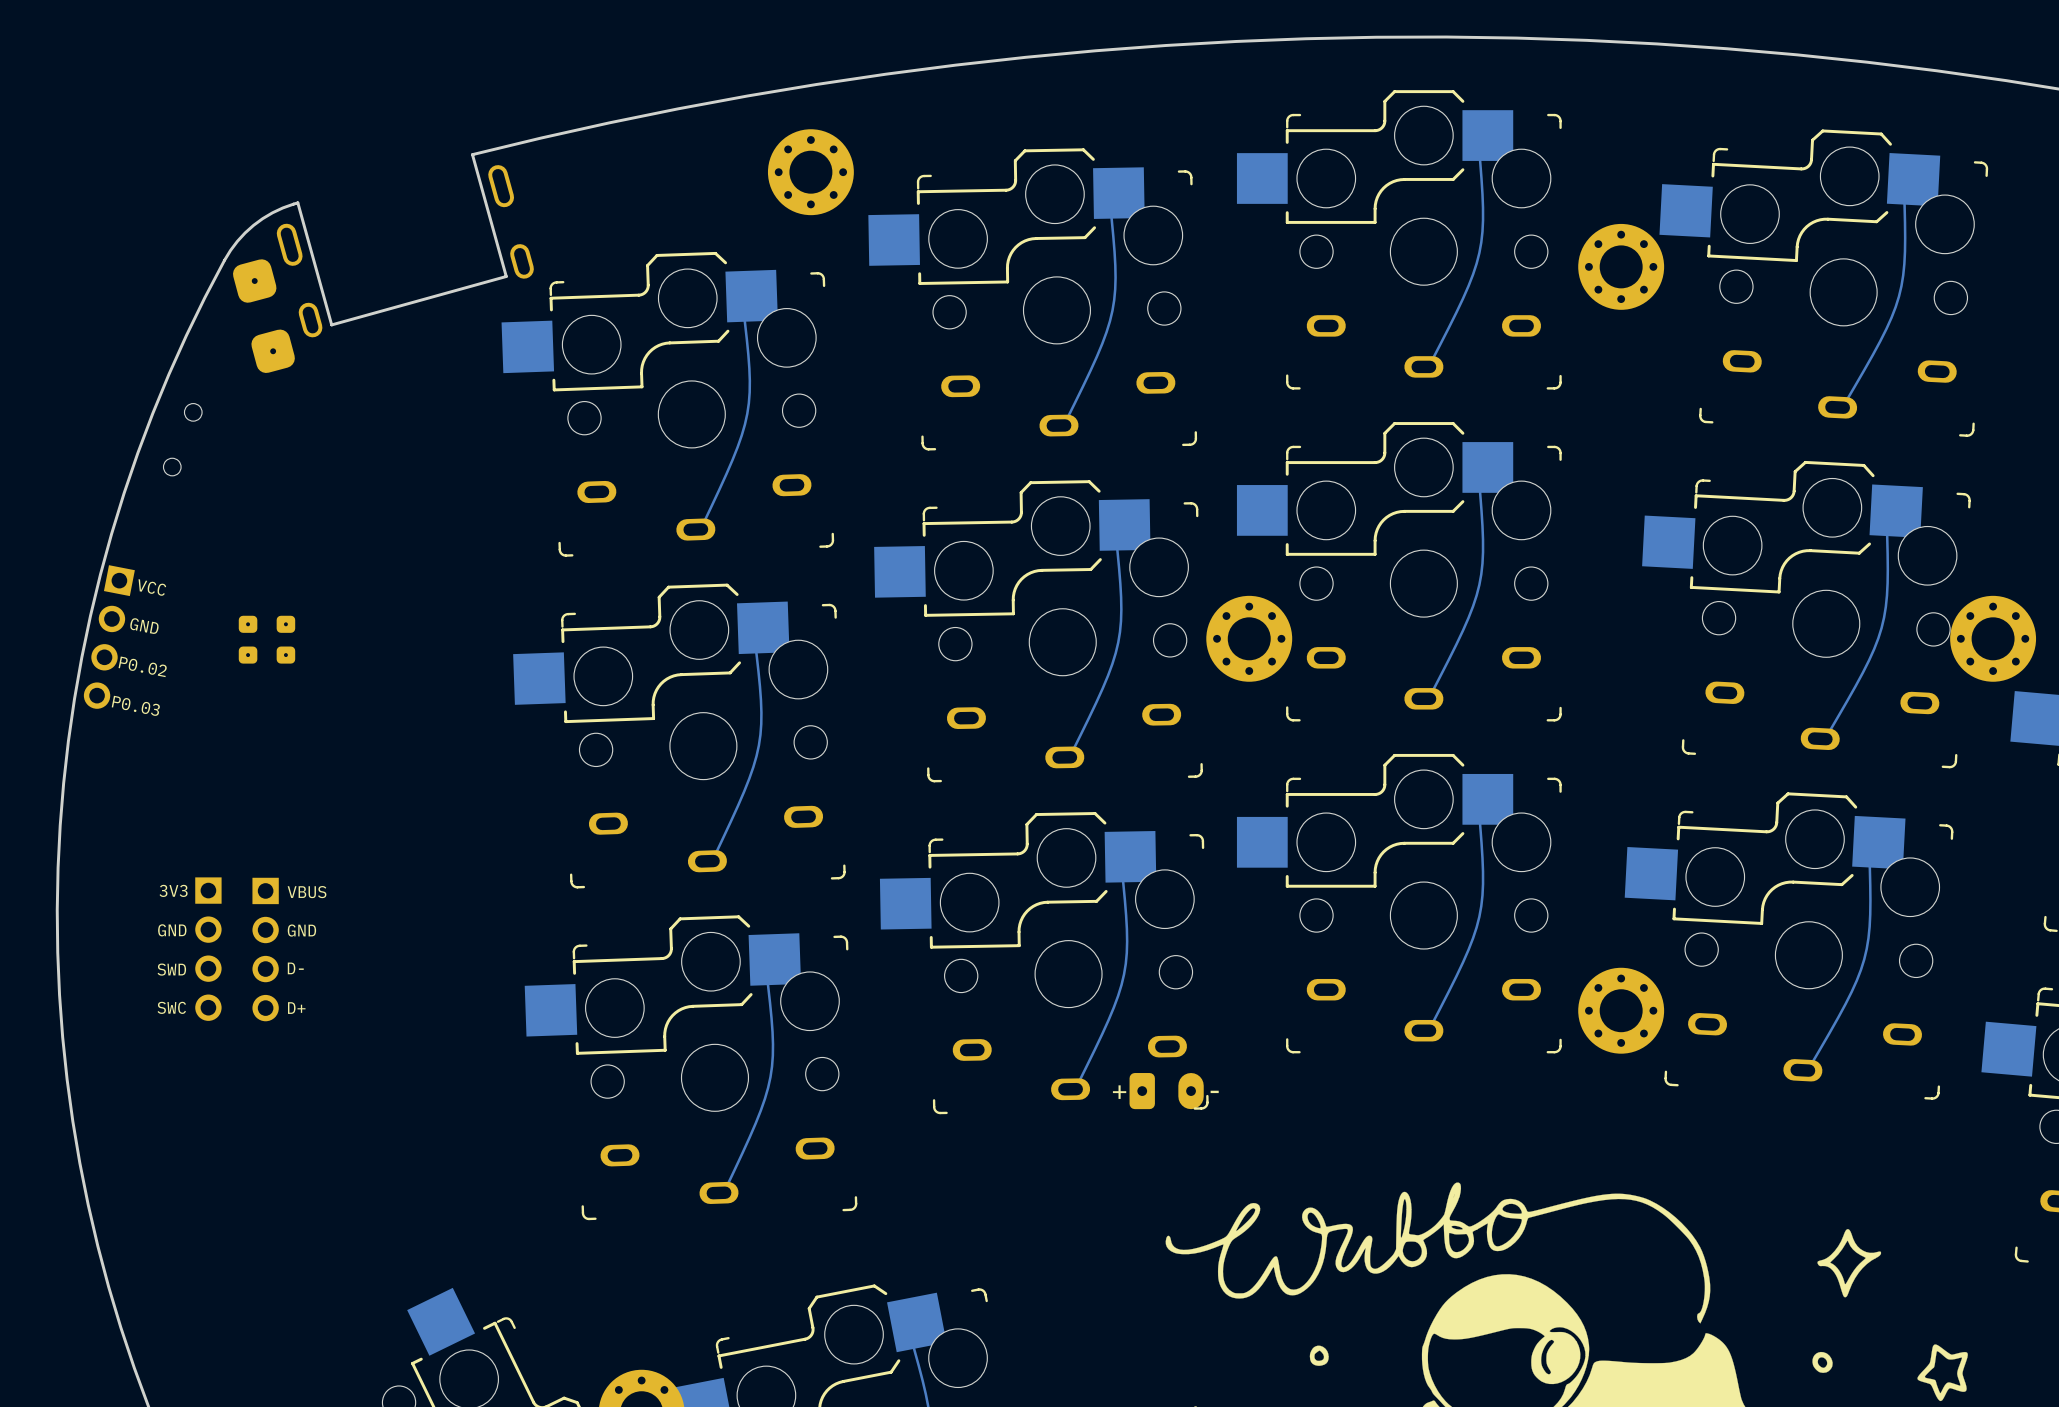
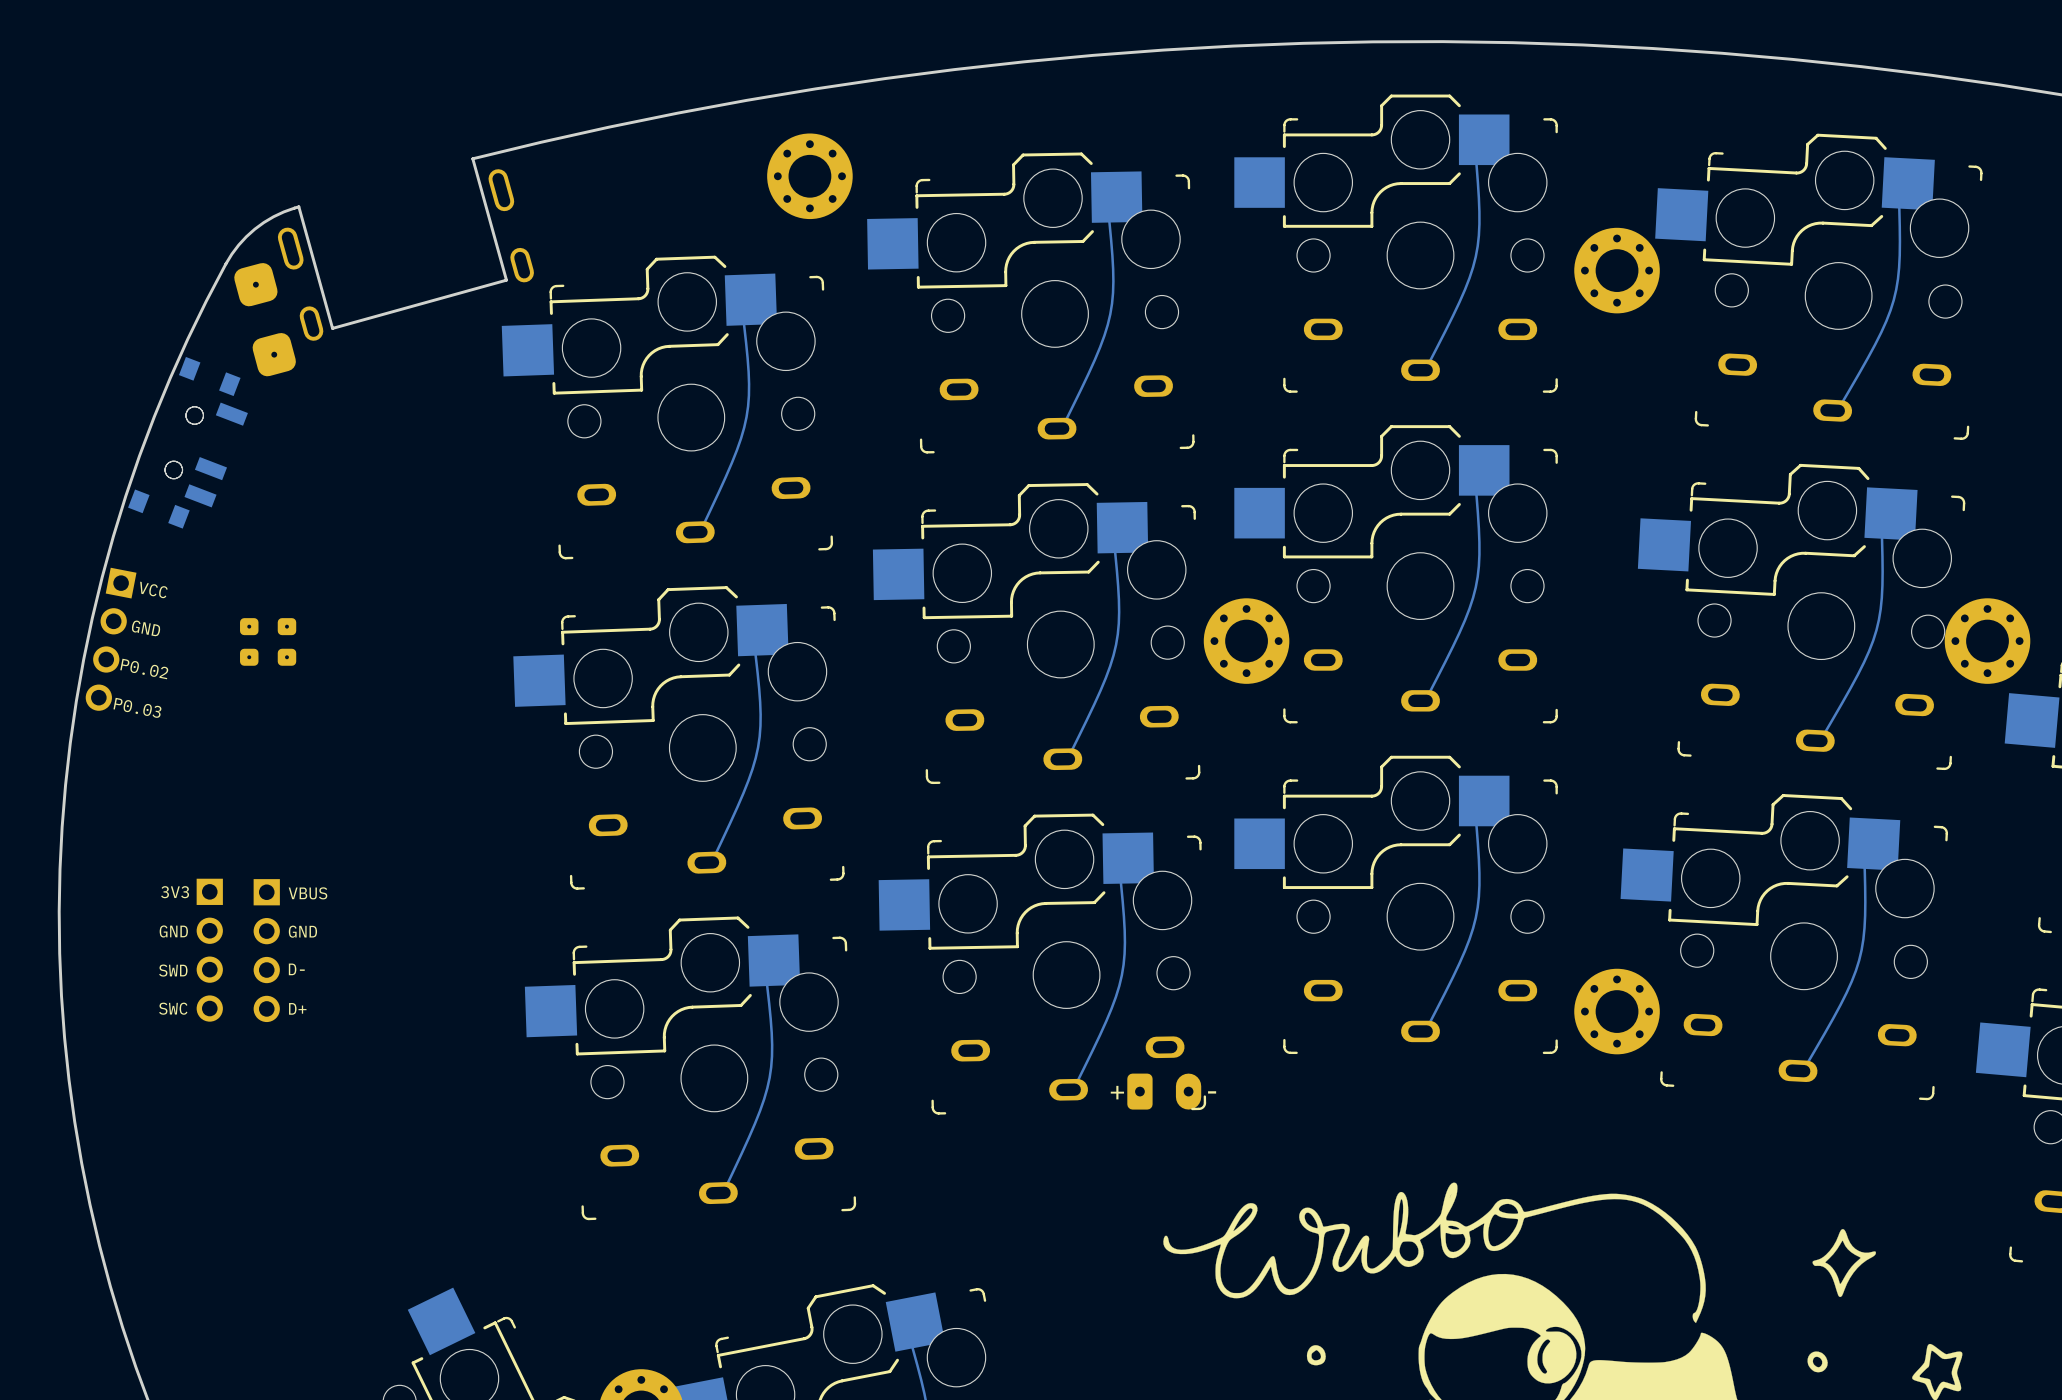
part: none -> (188, 442)

